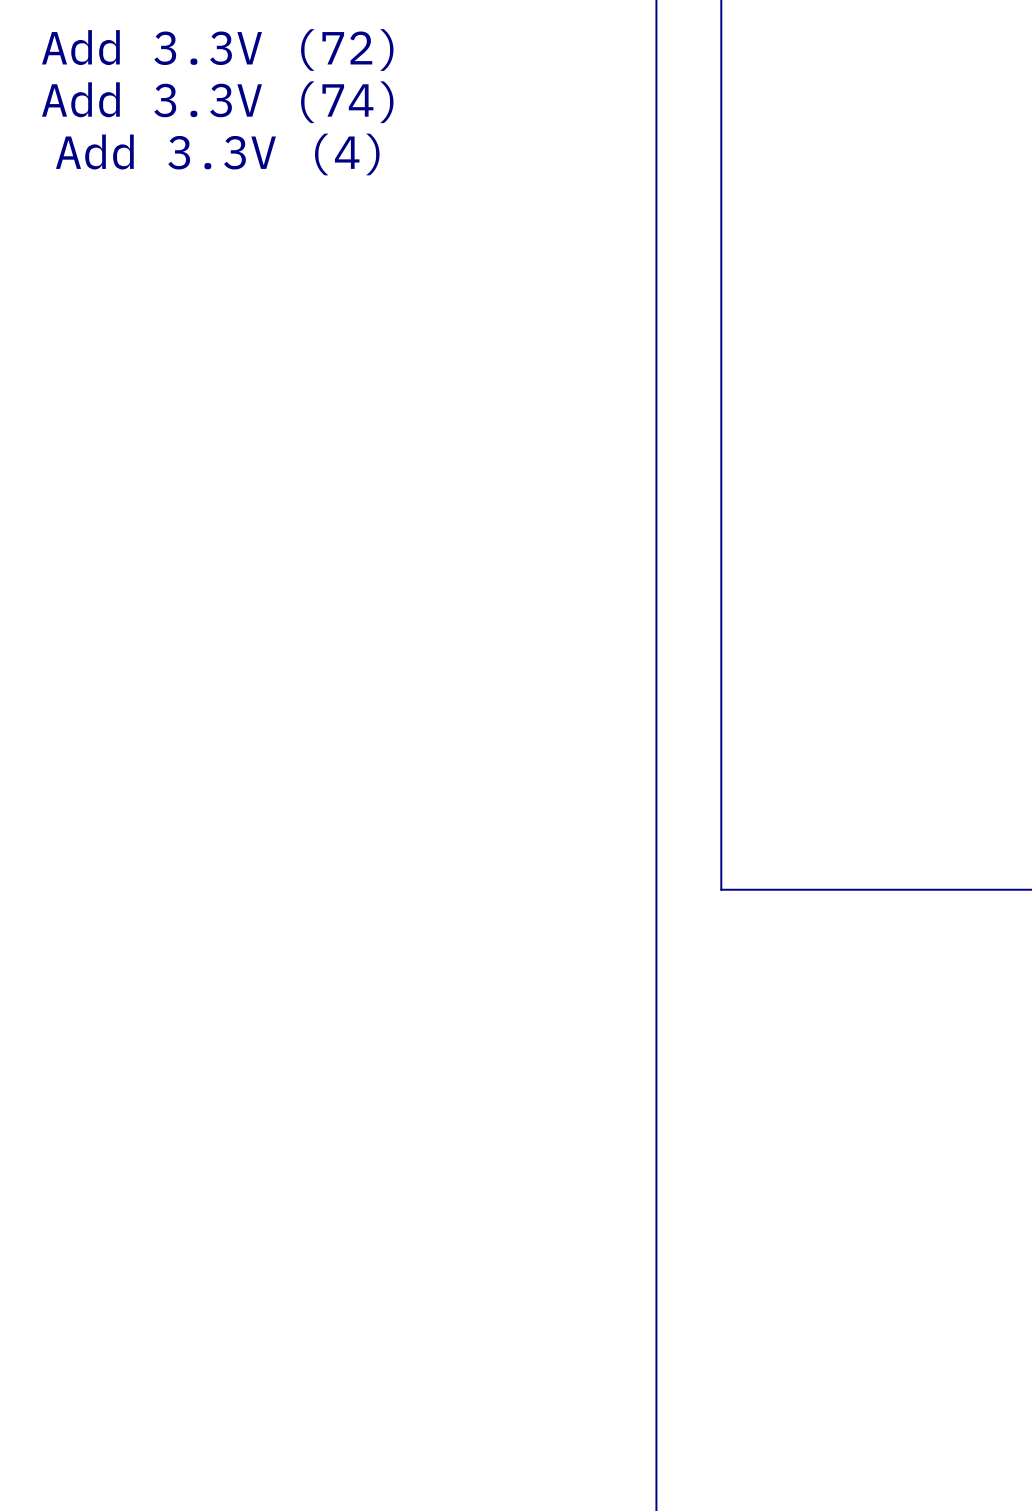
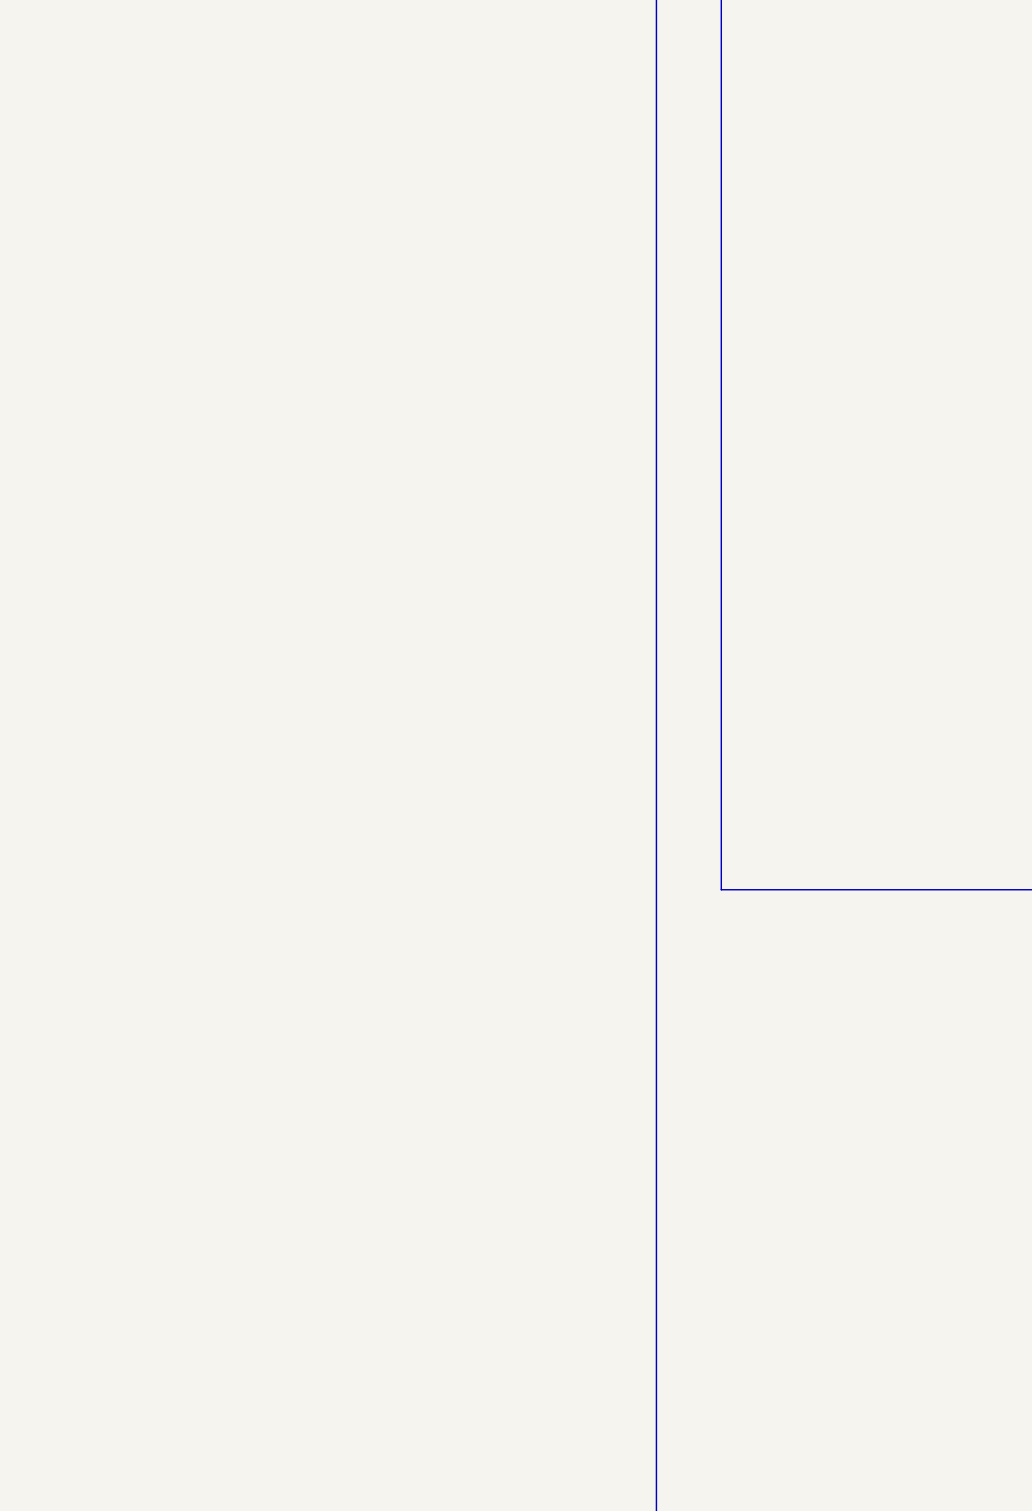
text: Add 3.3V (72) (217, 50) -> none
text: Add 3.3V (74) (217, 102) -> none
text: Add 3.3V (4) (217, 154) -> none

